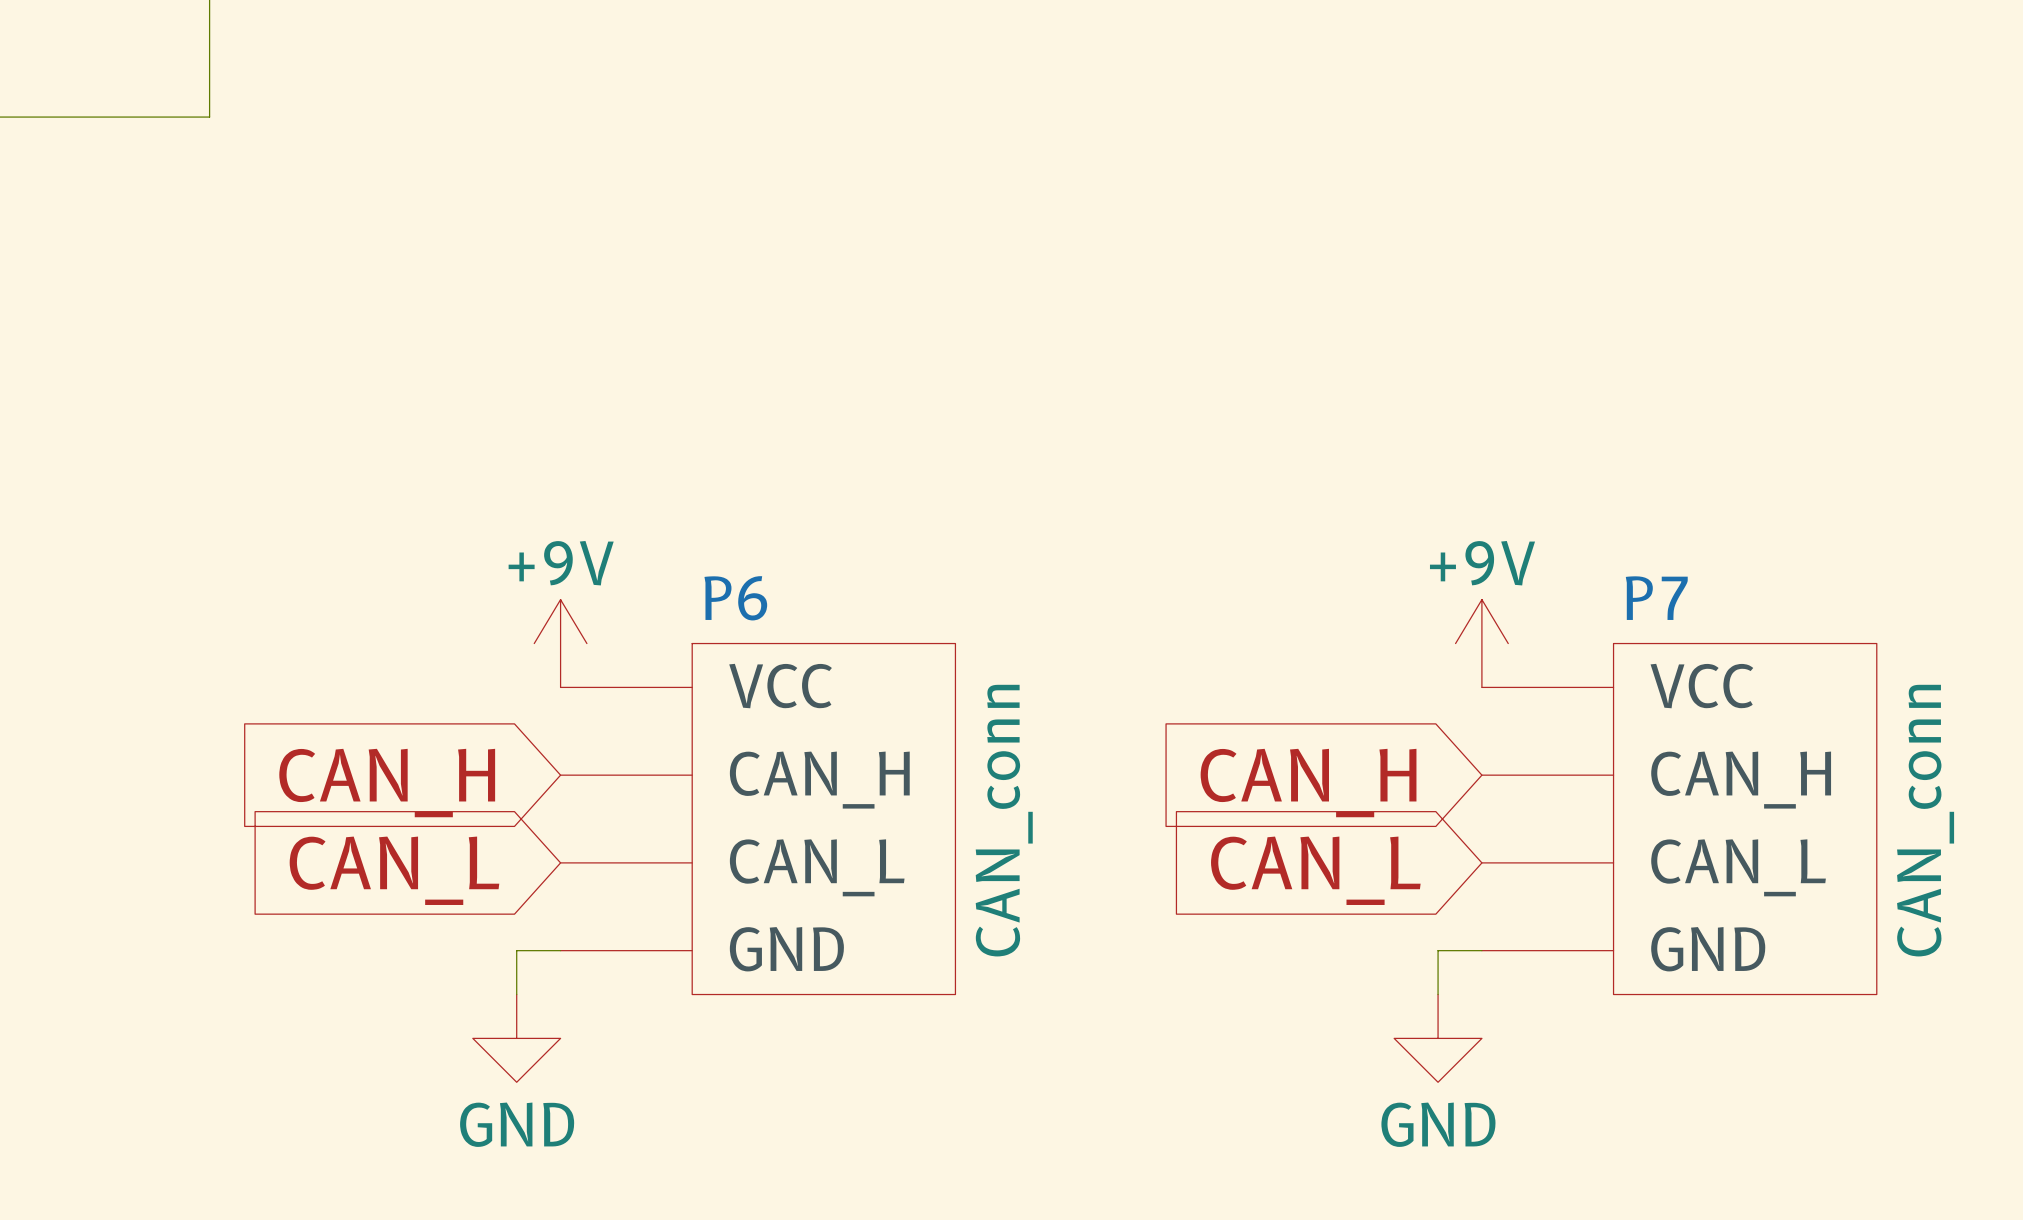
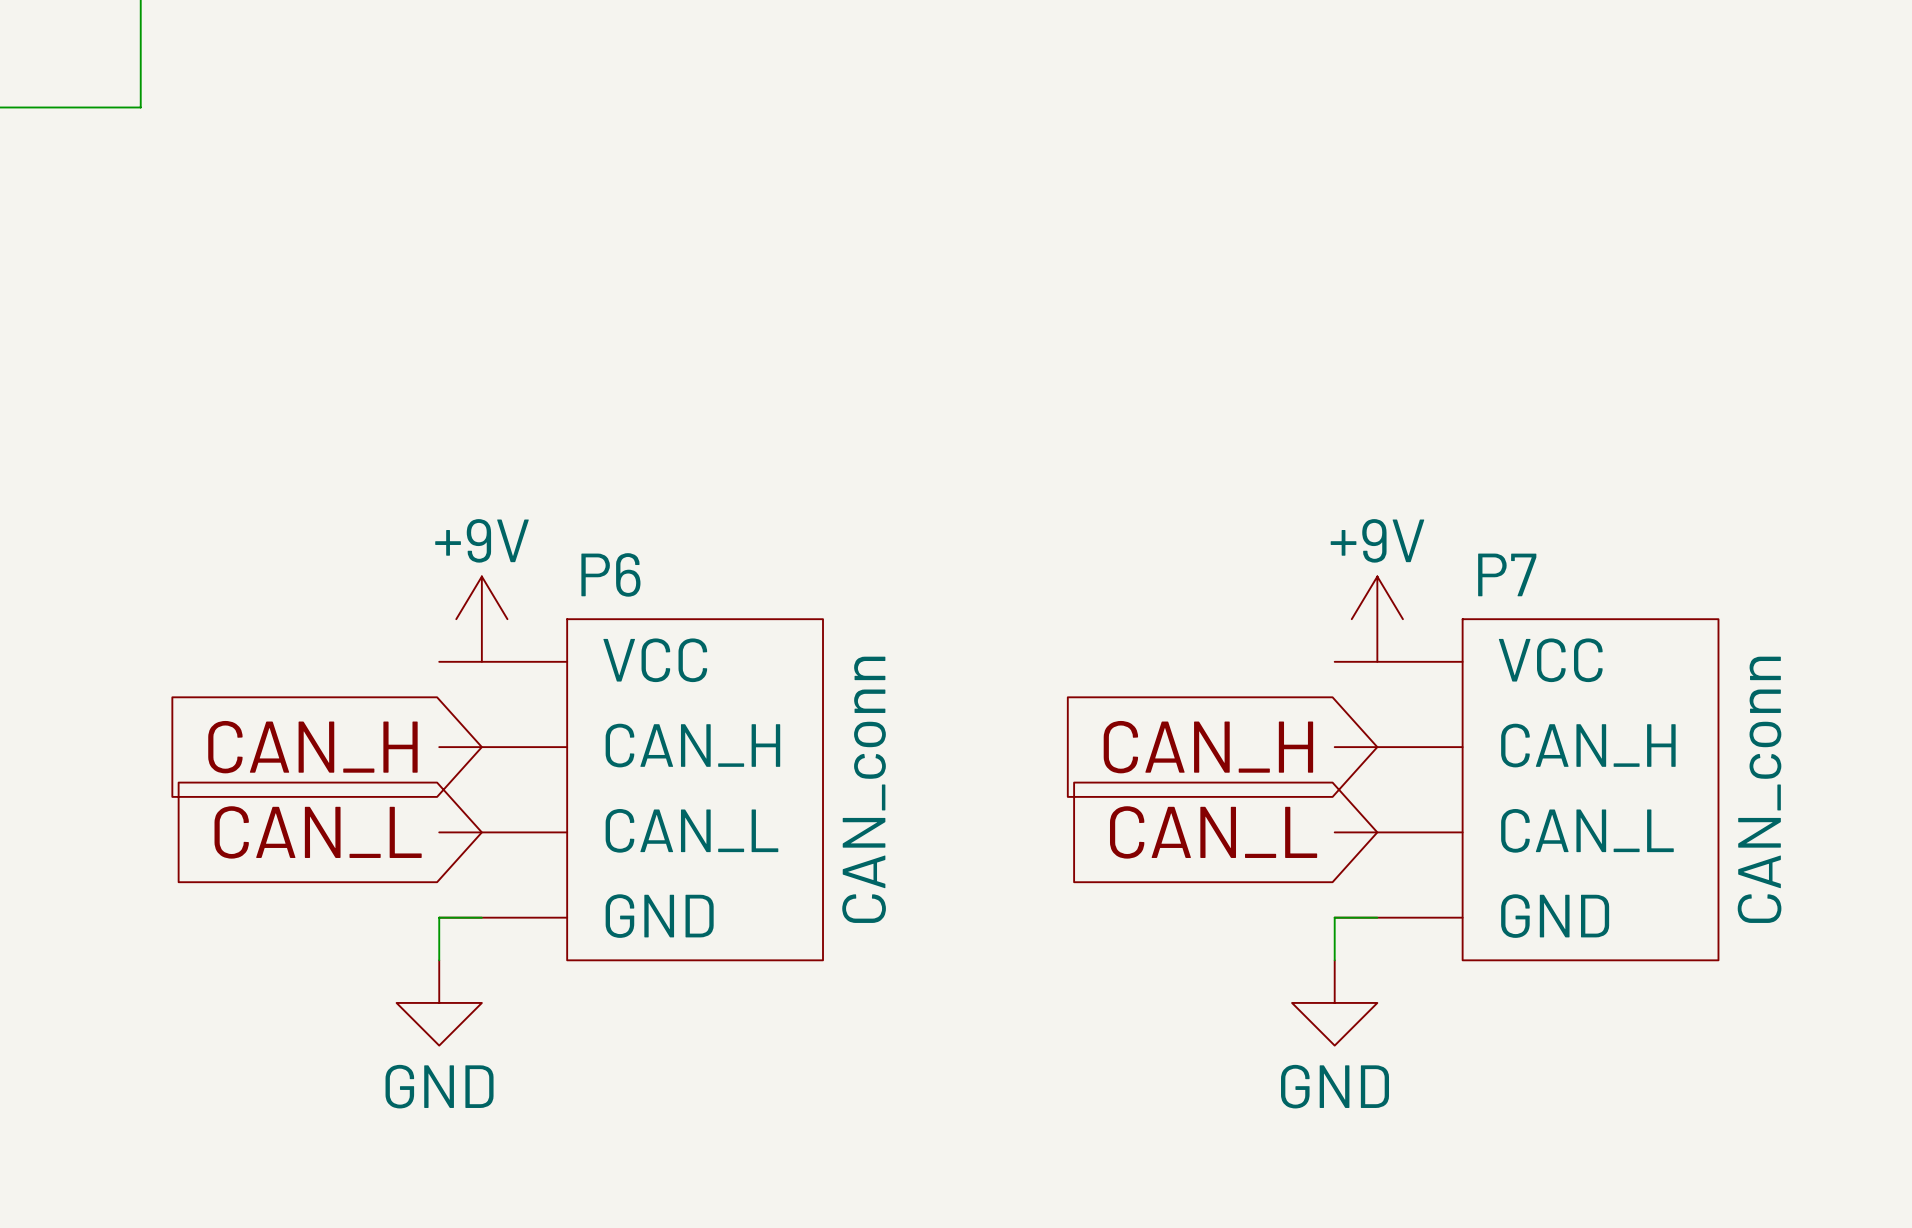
P6 position: (758, 819) -> (631, 789)
P7 position: (1679, 819) -> (1526, 789)

